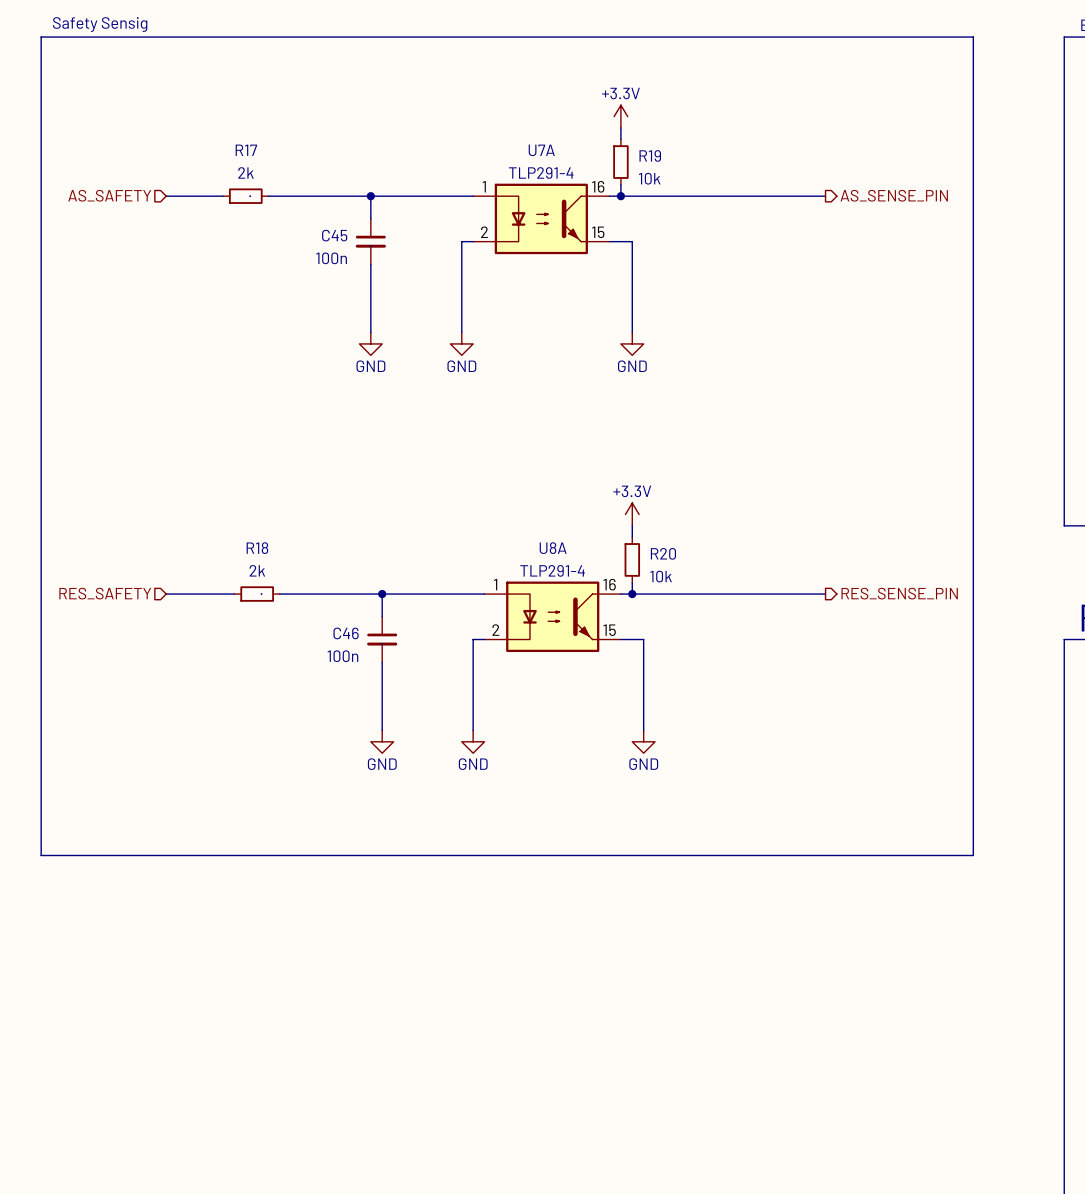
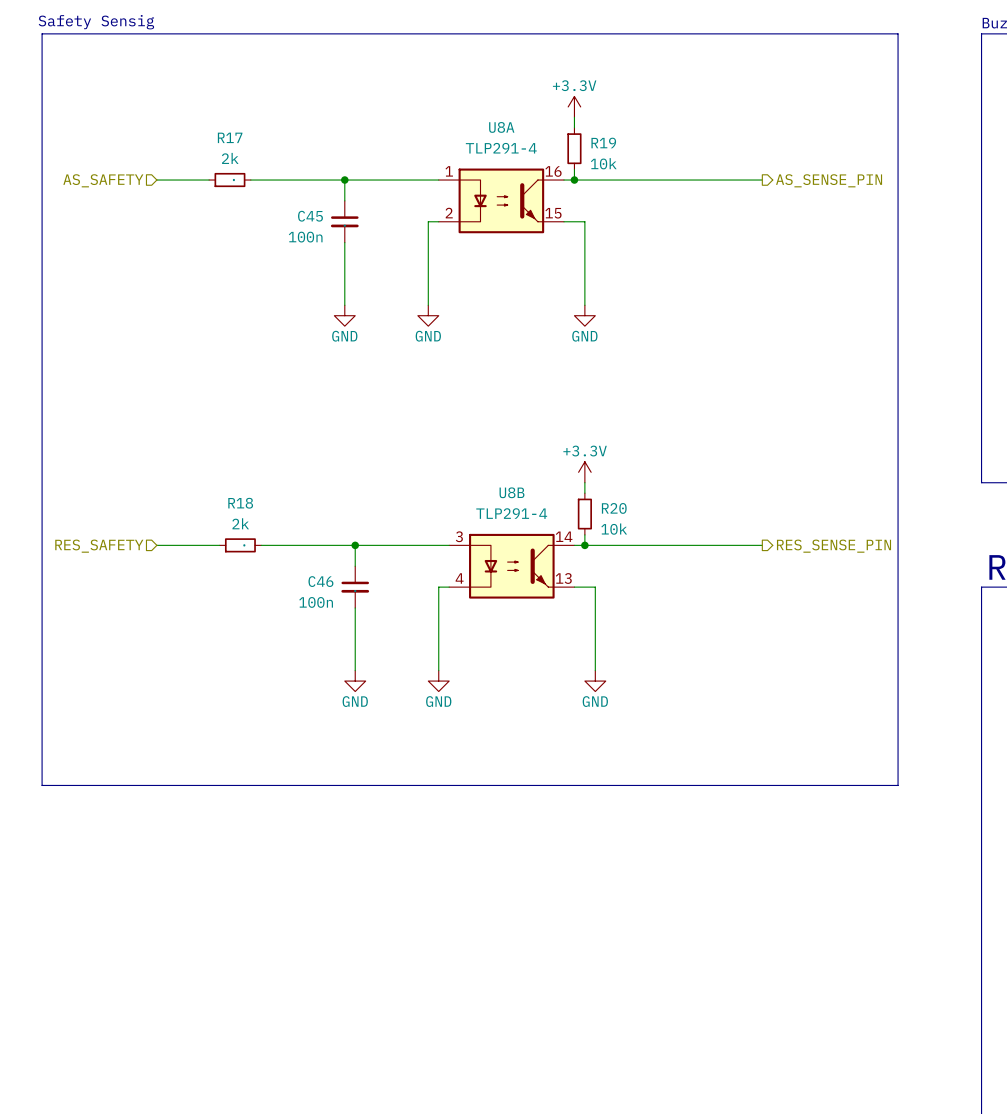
U7A: TLP291-4 (541, 218) -> none
U8A symbol: [484, 581, 621, 653] -> [438, 168, 565, 234]
U8B: none -> TLP291-4 (511, 566)

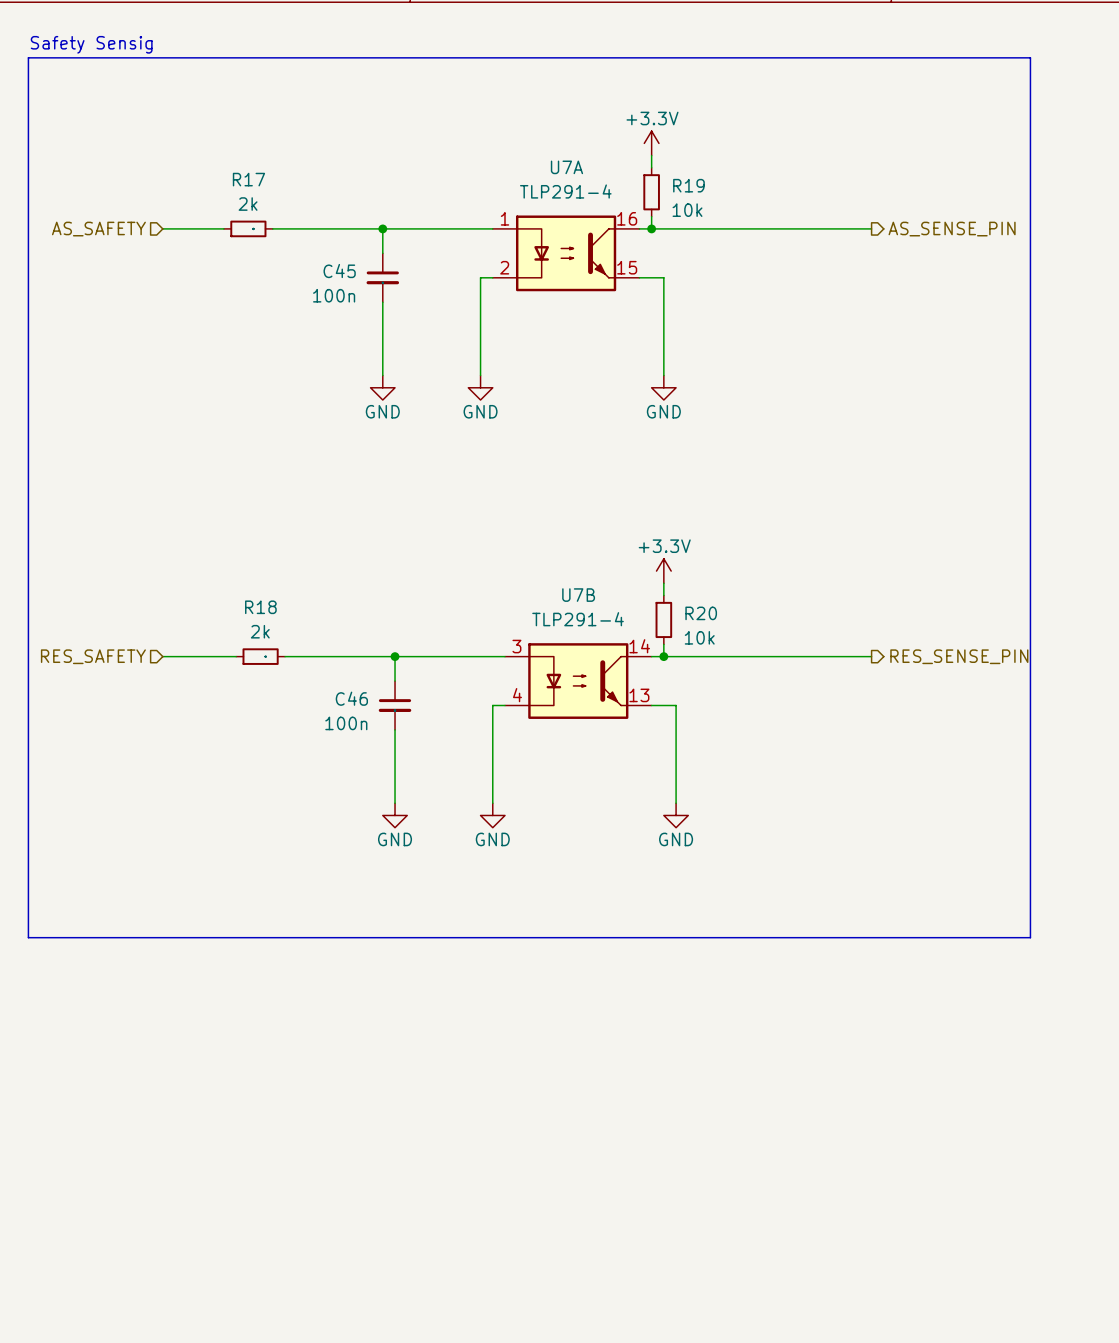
U8A name: U8A (501, 127) -> U7A (566, 167)
U8B name: U8B (511, 492) -> U7B (578, 595)

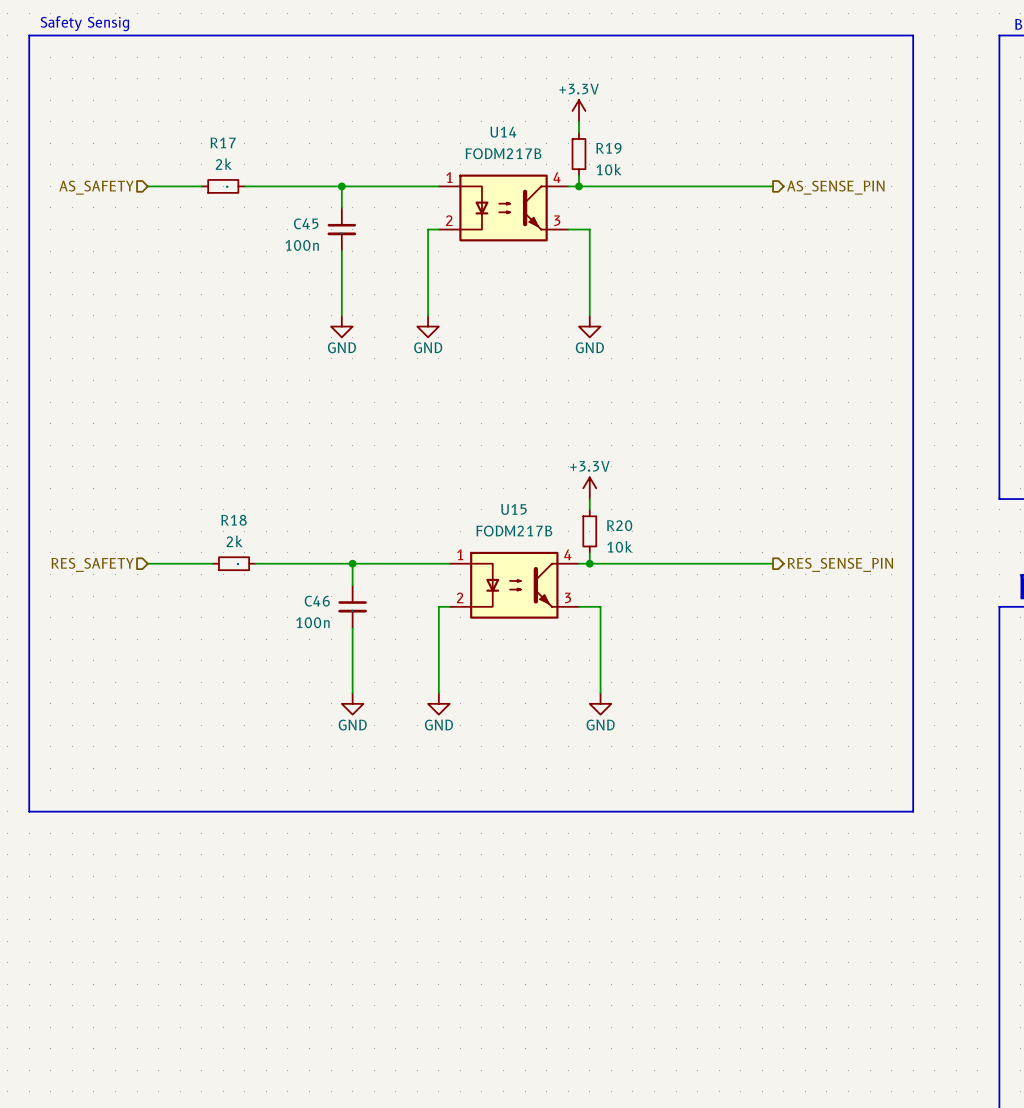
U7A: TLP291-4 (566, 253) -> none
U14: none -> FODM217B (503, 207)
U7B: TLP291-4 (578, 681) -> none
U15: none -> FODM217B (514, 585)

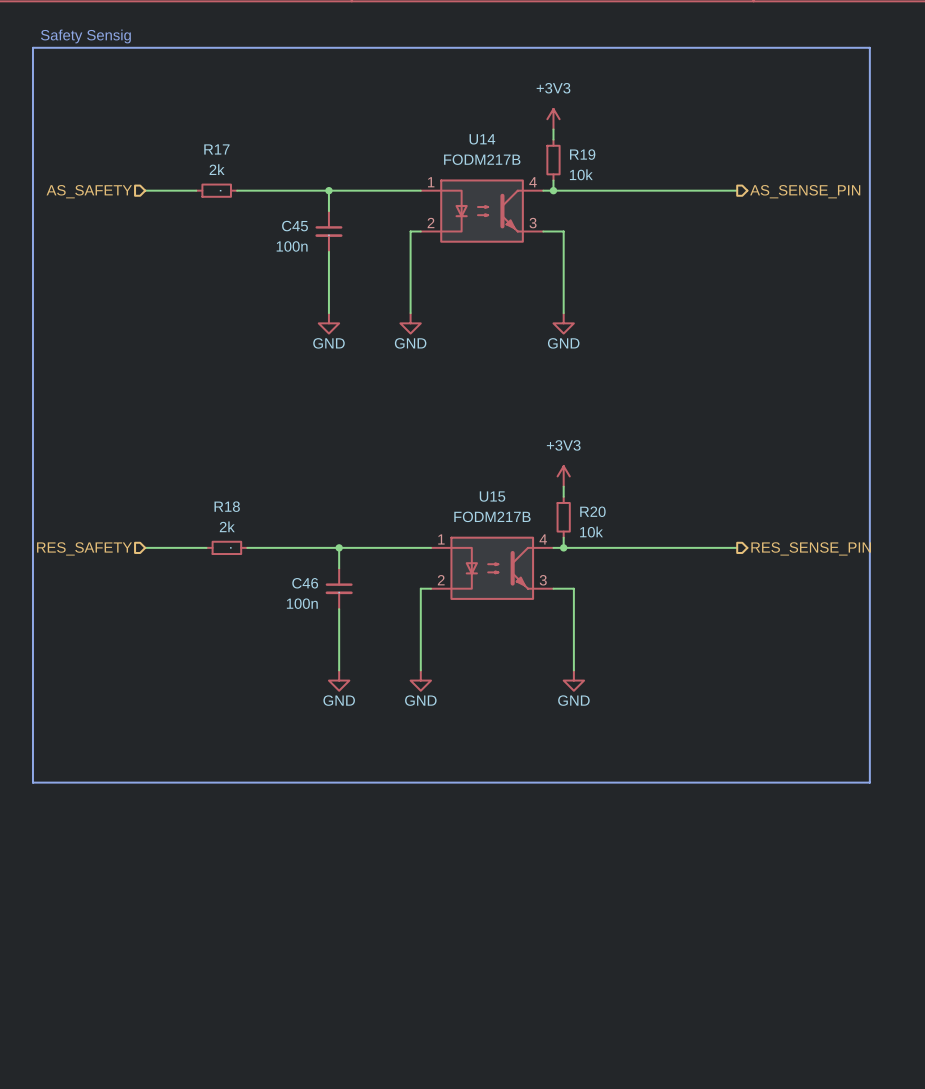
power symbol: +3.3V (578, 110) -> +3V3 (553, 119)
power symbol: +3.3V (589, 488) -> +3V3 (563, 476)

